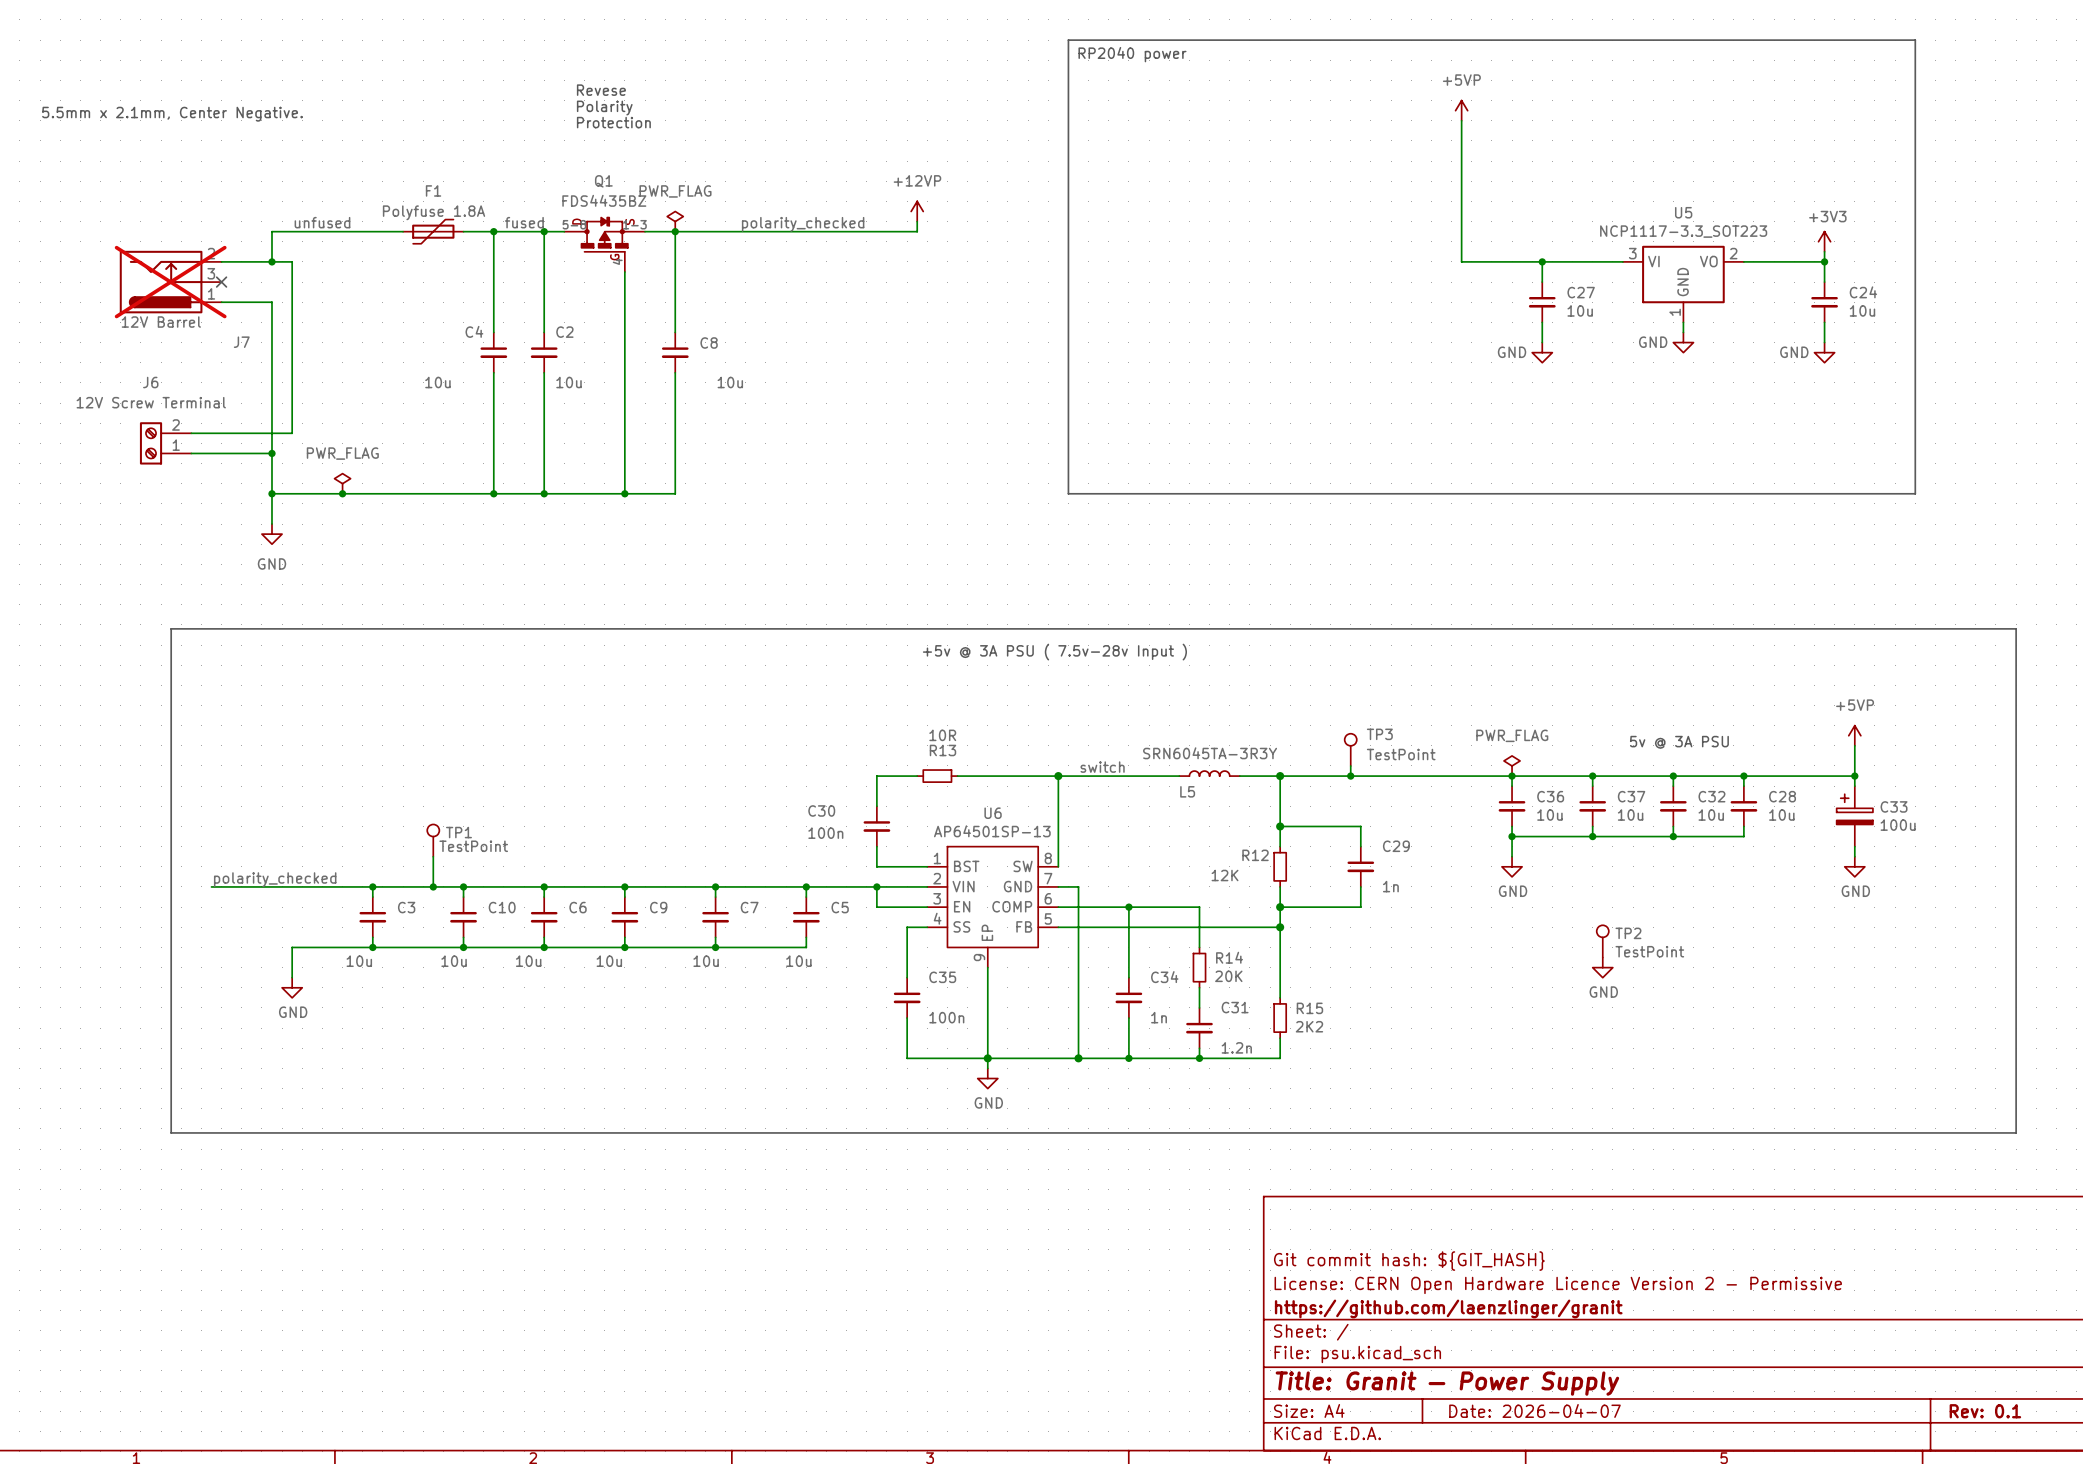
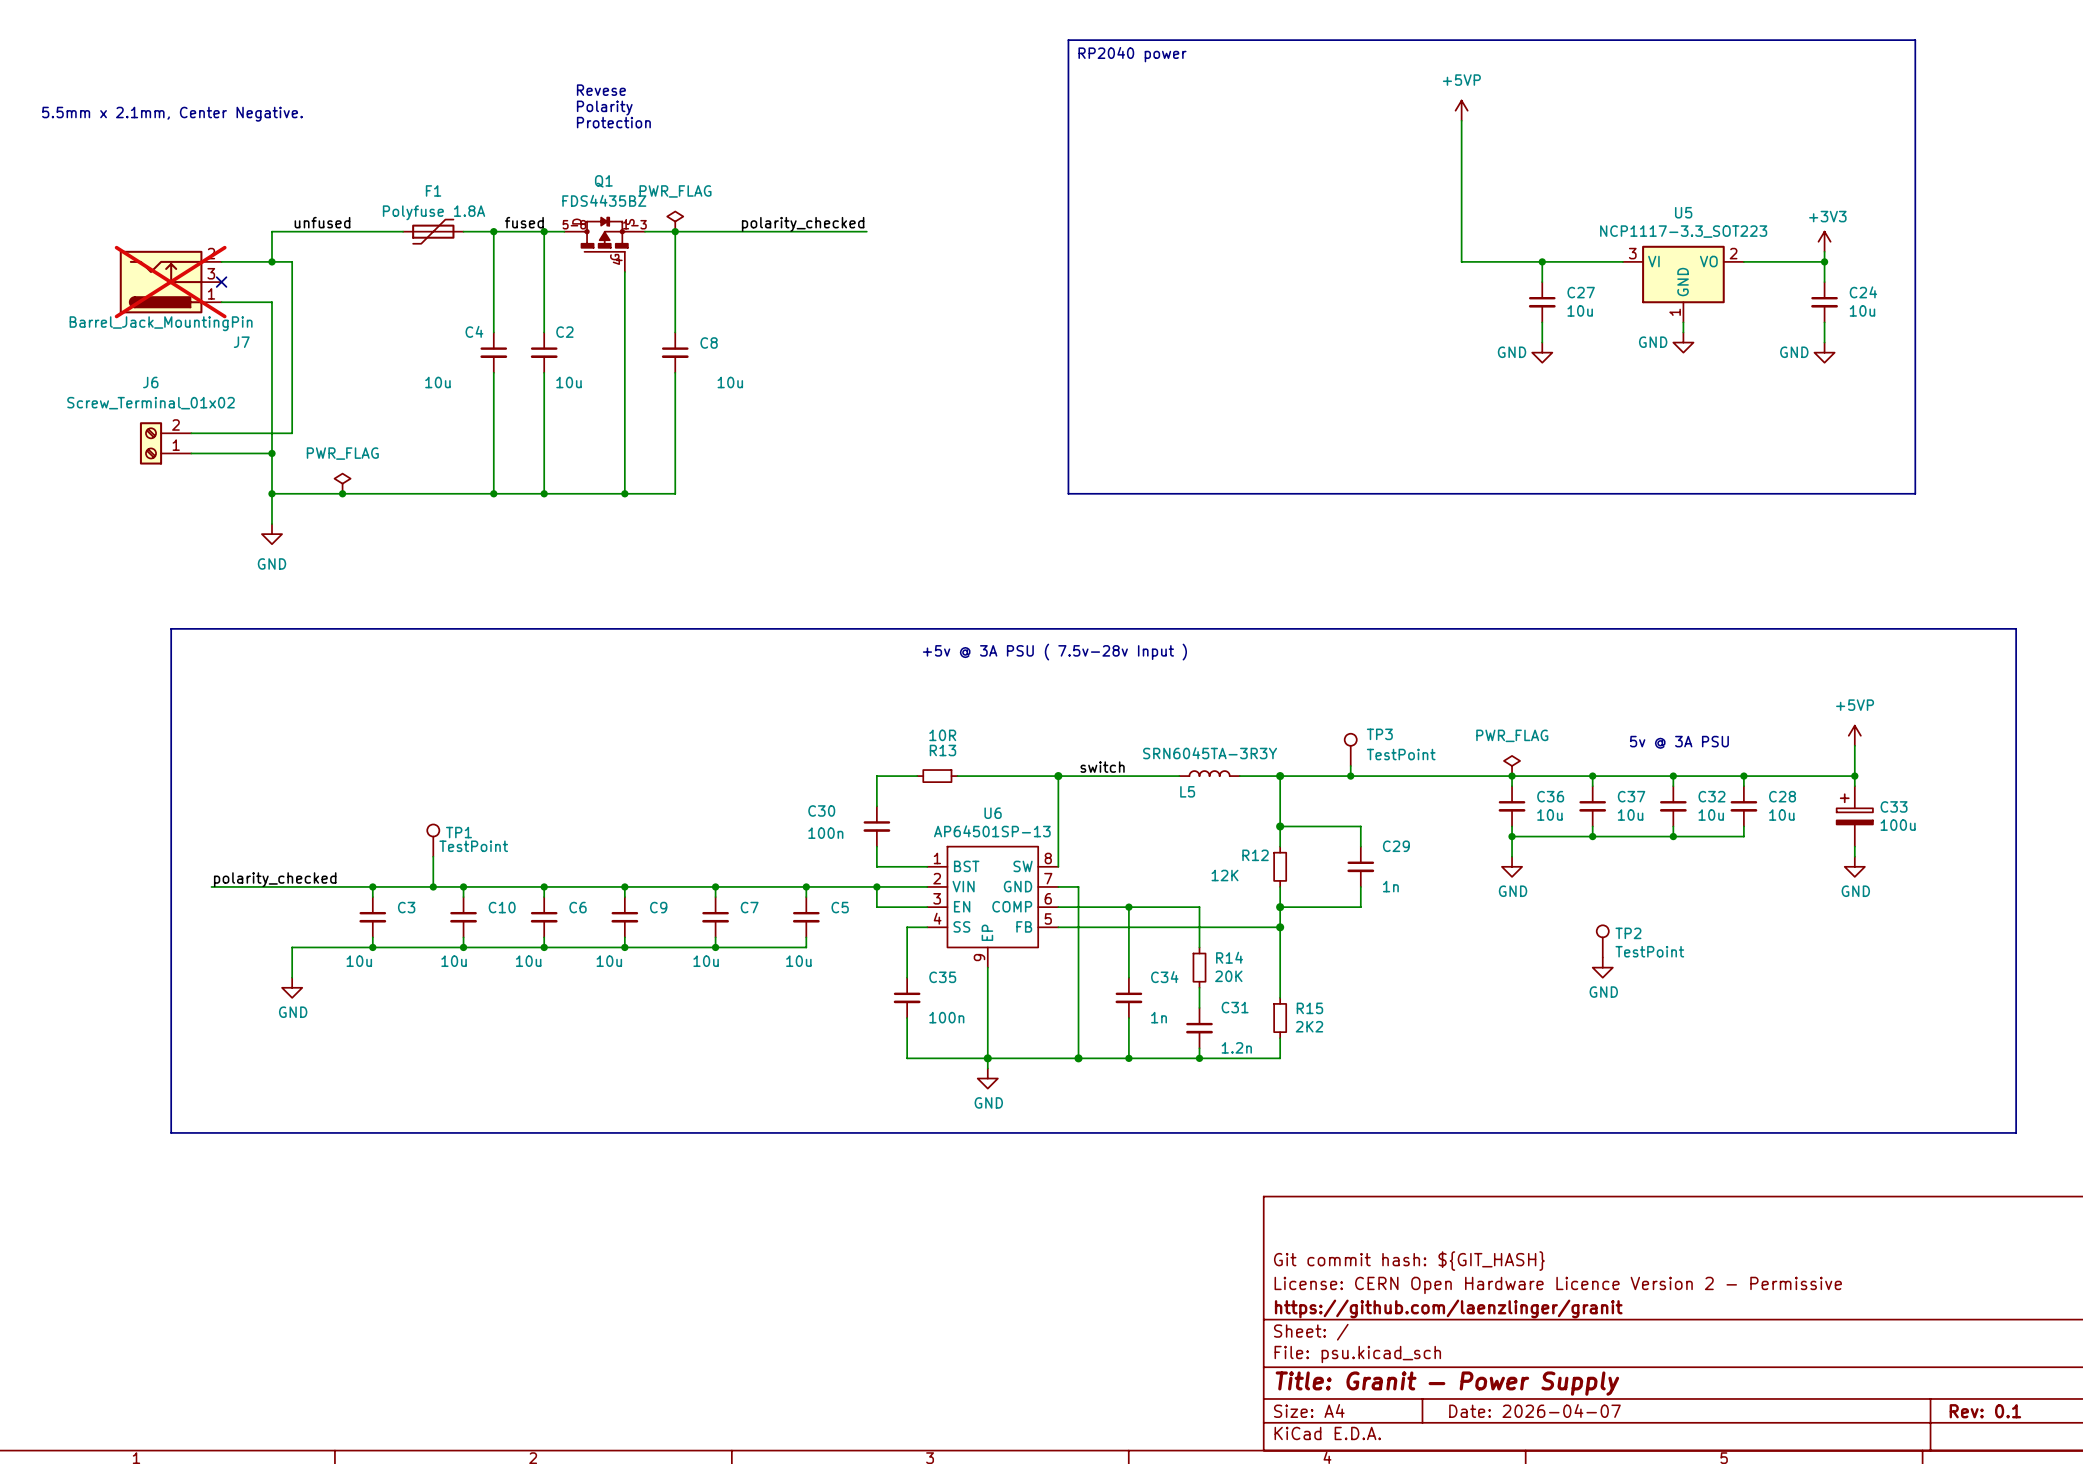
power symbol: +12VP (917, 211) -> none
wire: (917, 221) (917, 231) (866, 231) -> none
J7 value: 12V Barrel (161, 322) -> Barrel_Jack_MountingPin (161, 323)
J6 value: 12V Screw Terminal (151, 402) -> Screw_Terminal_01x02 (151, 403)

